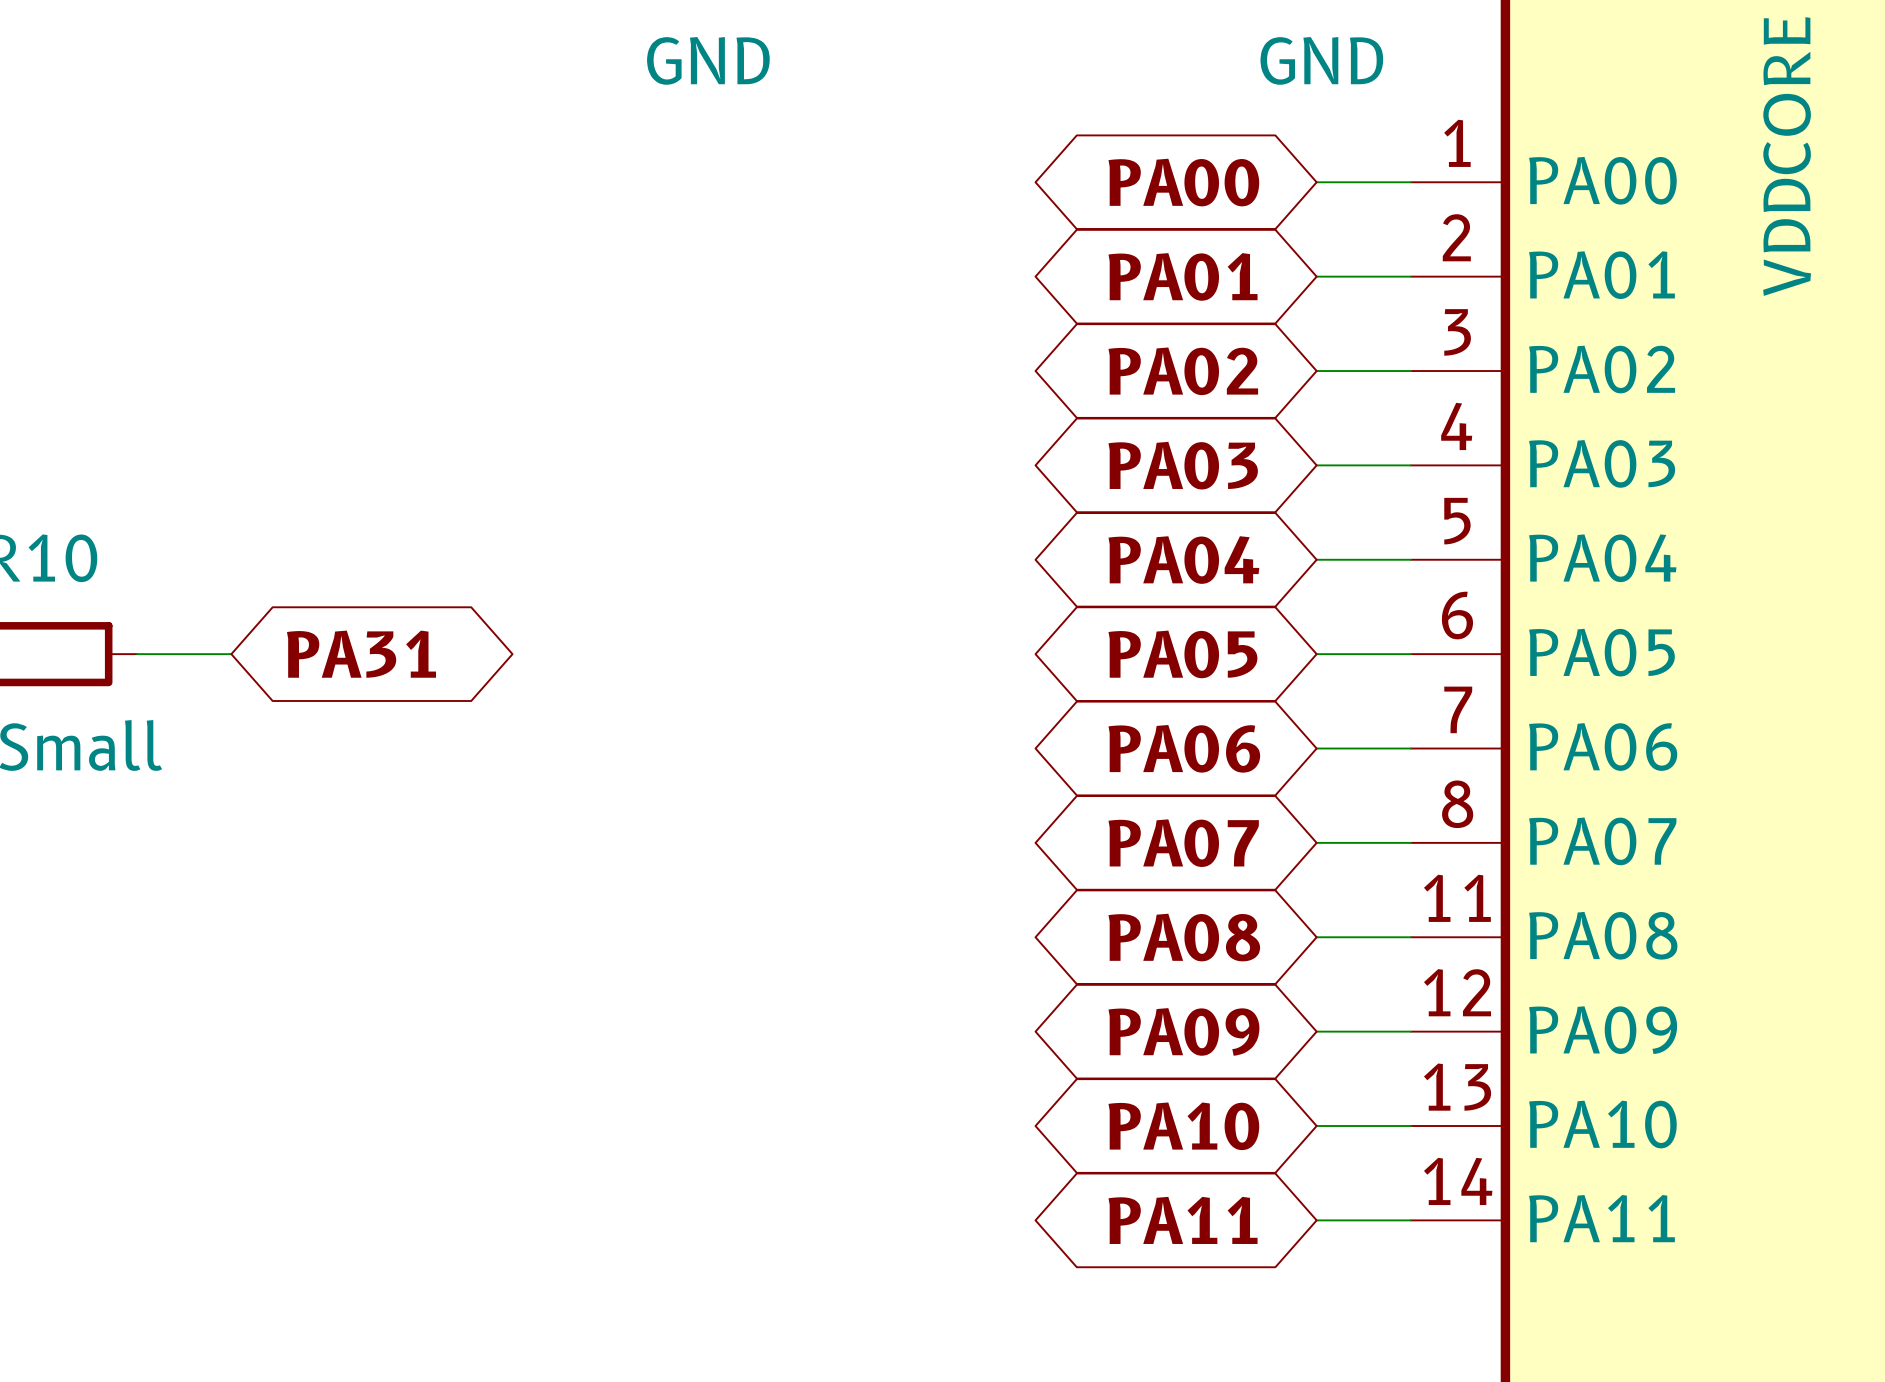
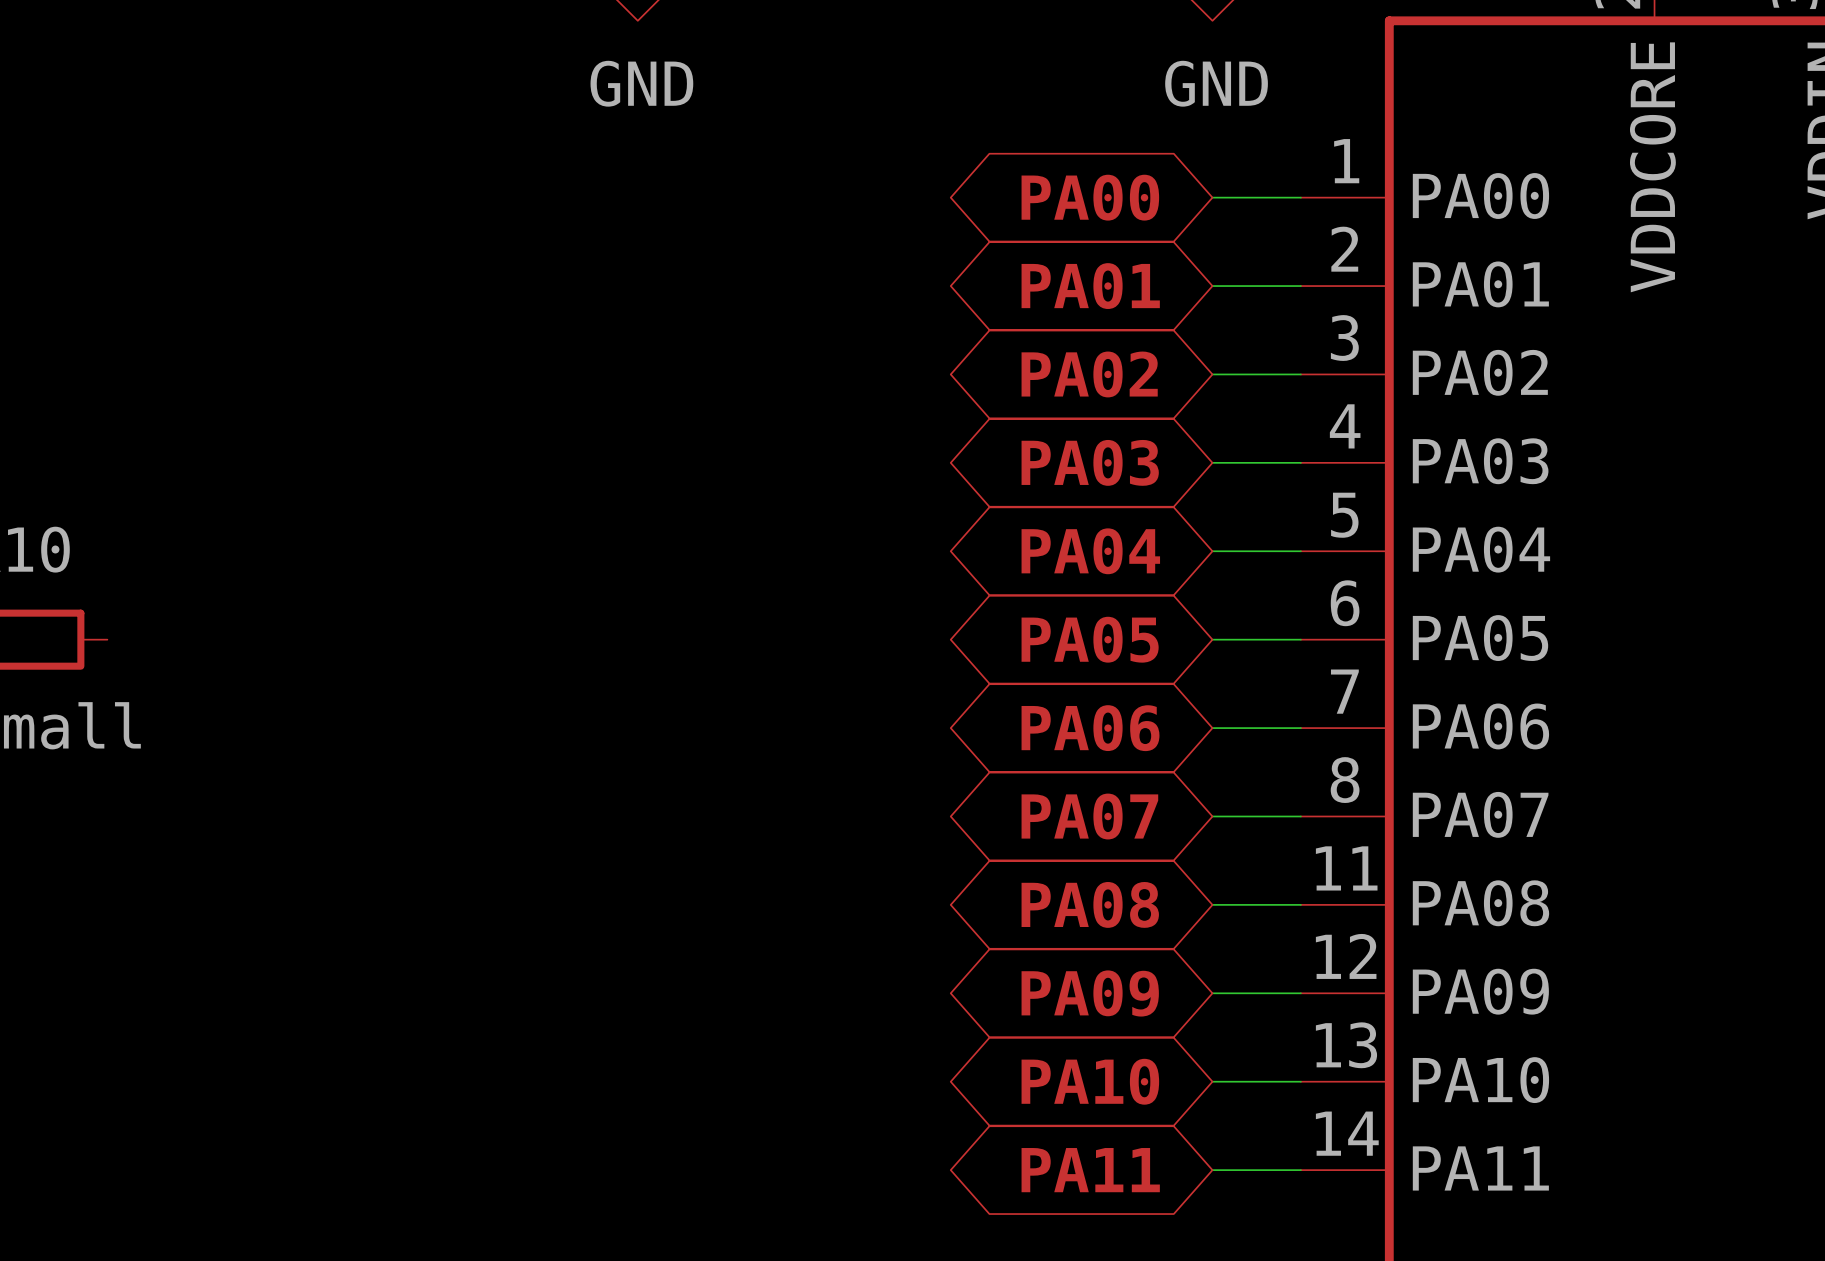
wire: (137, 654) (231, 654) -> none
global label: PA31 (361, 654) -> none

